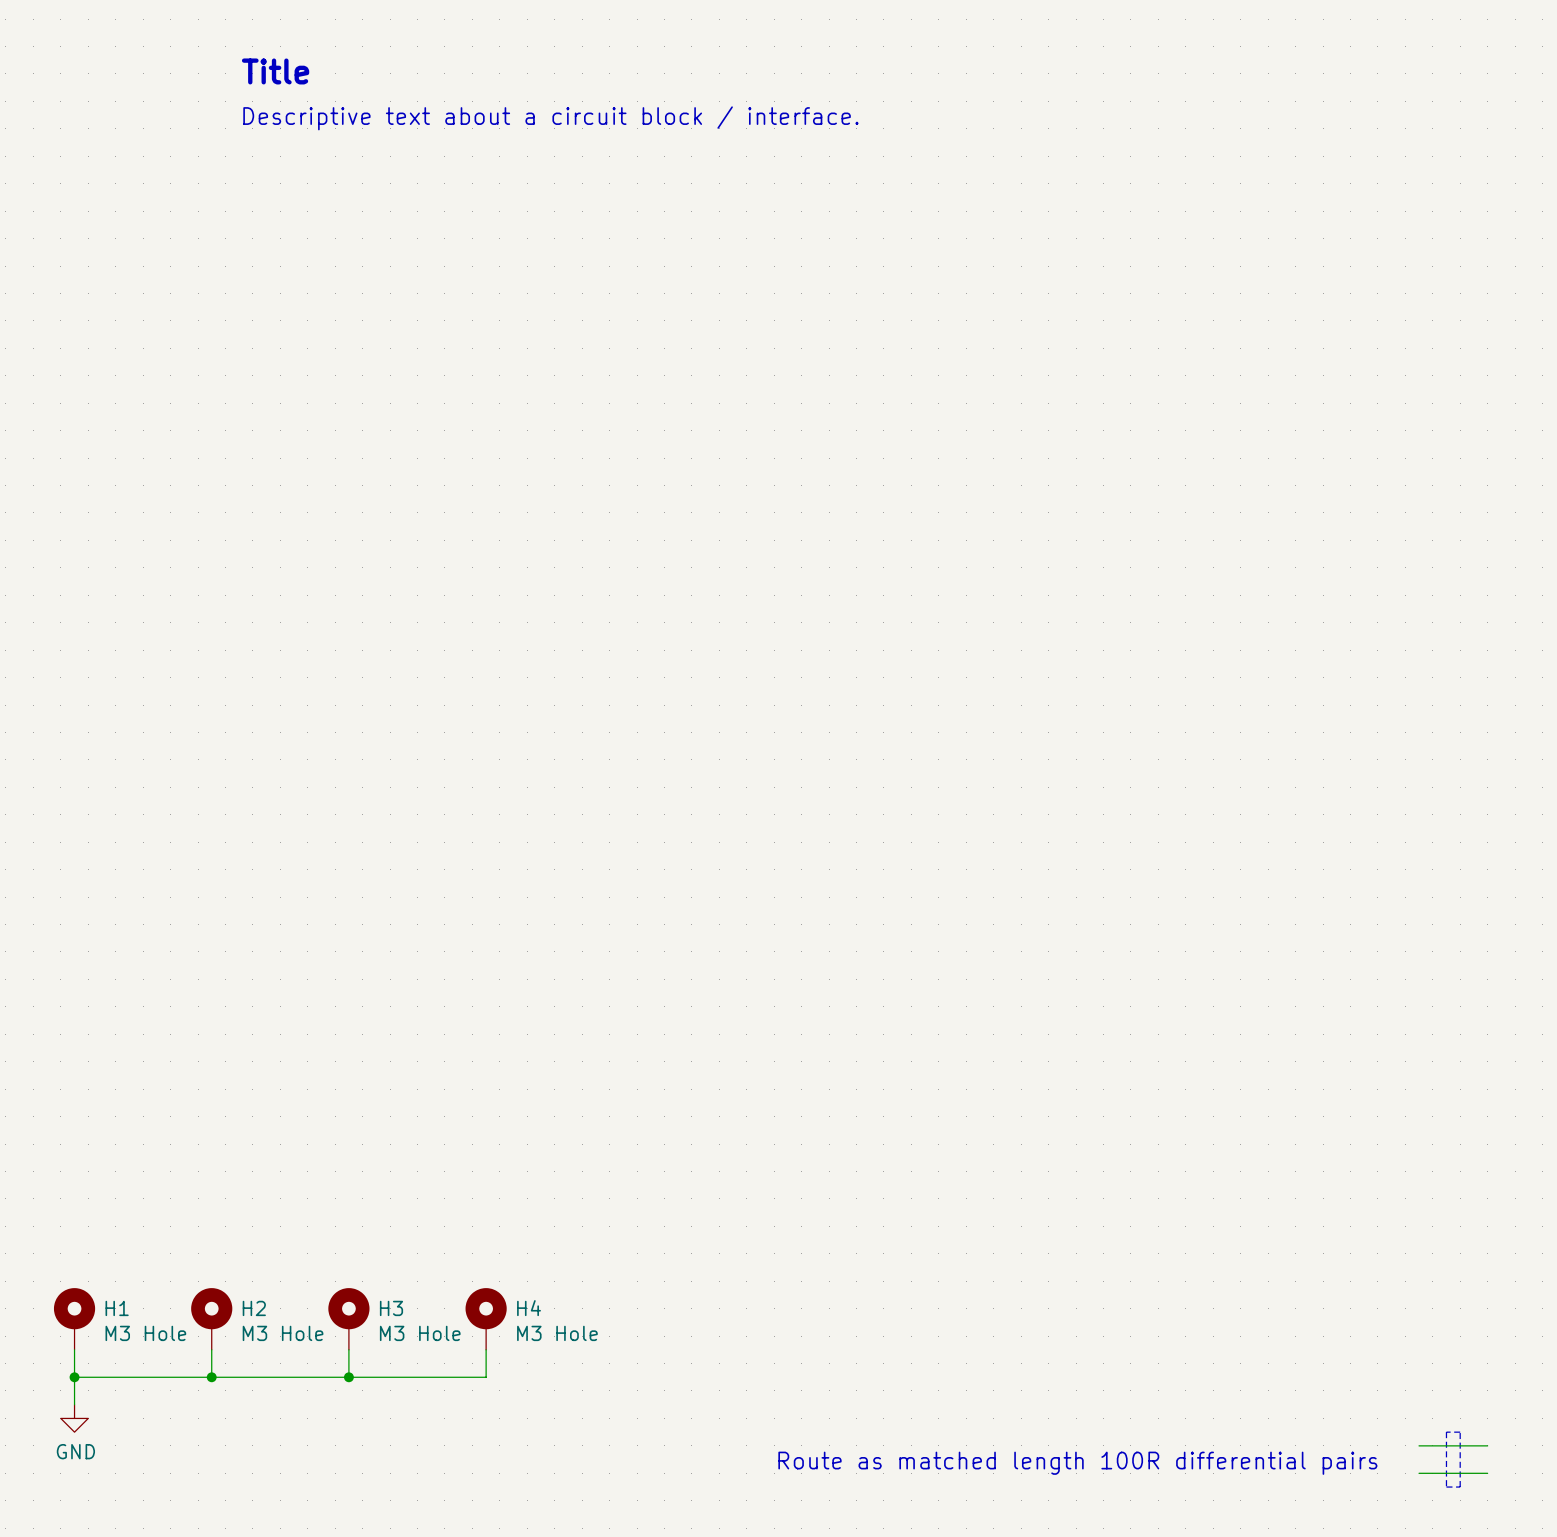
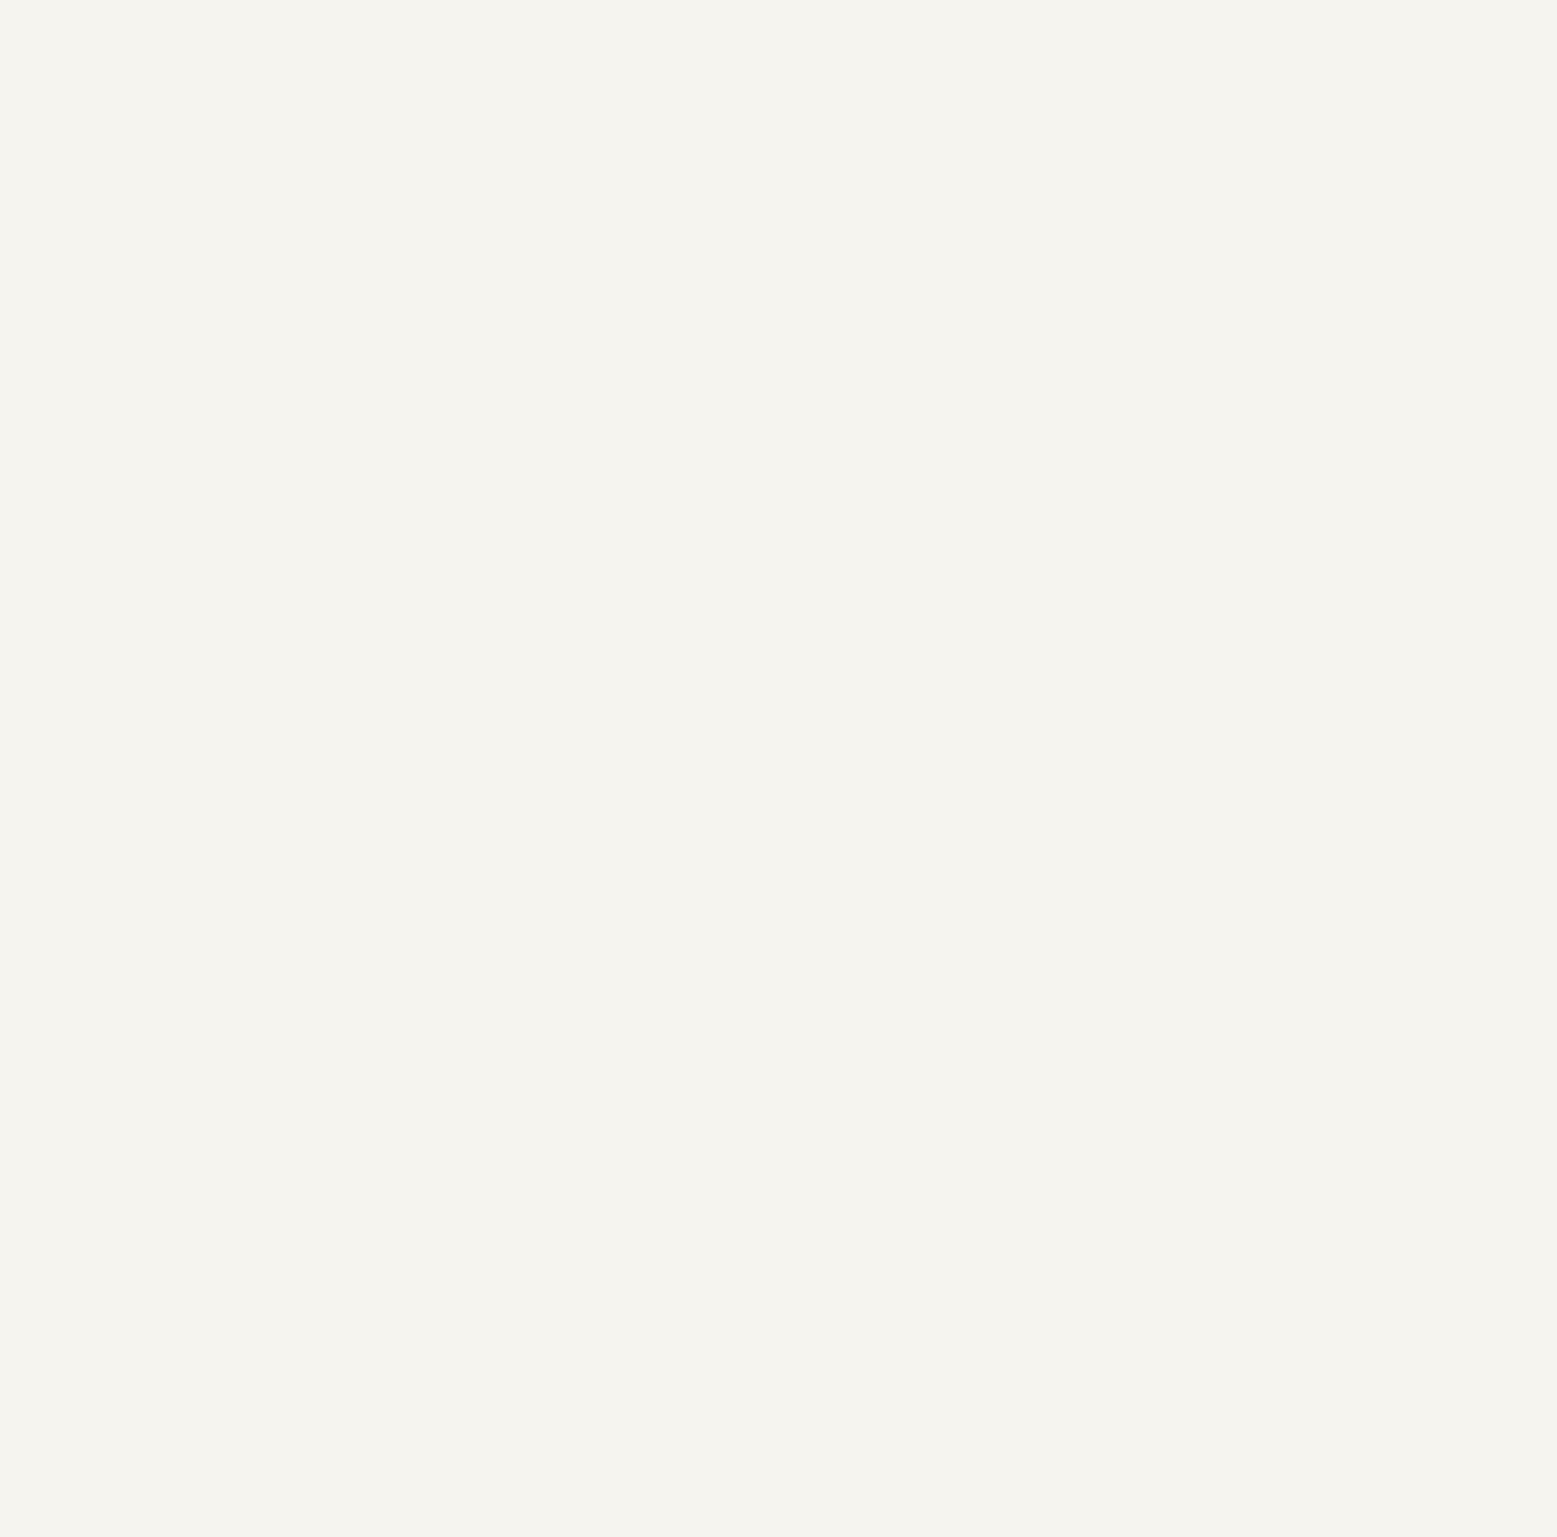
text: Title (275, 71) -> none
text: Descriptive text about a circuit block / interface. (550, 118) -> none
H1: M3 Hole (74, 1318) -> none
H2: M3 Hole (211, 1318) -> none
H3: M3 Hole (348, 1318) -> none
H4: M3 Hole (486, 1318) -> none
wire: (74, 1349) (74, 1404) -> none
wire: (211, 1349) (211, 1377) -> none
wire: (348, 1349) (348, 1377) -> none
wire: (486, 1349) (486, 1377) (74, 1377) -> none
junction: (74, 1377) -> none
junction: (211, 1377) -> none
junction: (348, 1377) -> none
power symbol: GND (74, 1418) -> none
line: (1446, 1432) (1446, 1487) (1460, 1487) (1460, 1432) (1446, 1432) -> none
wire: (1419, 1445) (1487, 1445) -> none
text: Route as matched length 100R differential pairs (1077, 1463) -> none
wire: (1419, 1473) (1487, 1473) -> none

